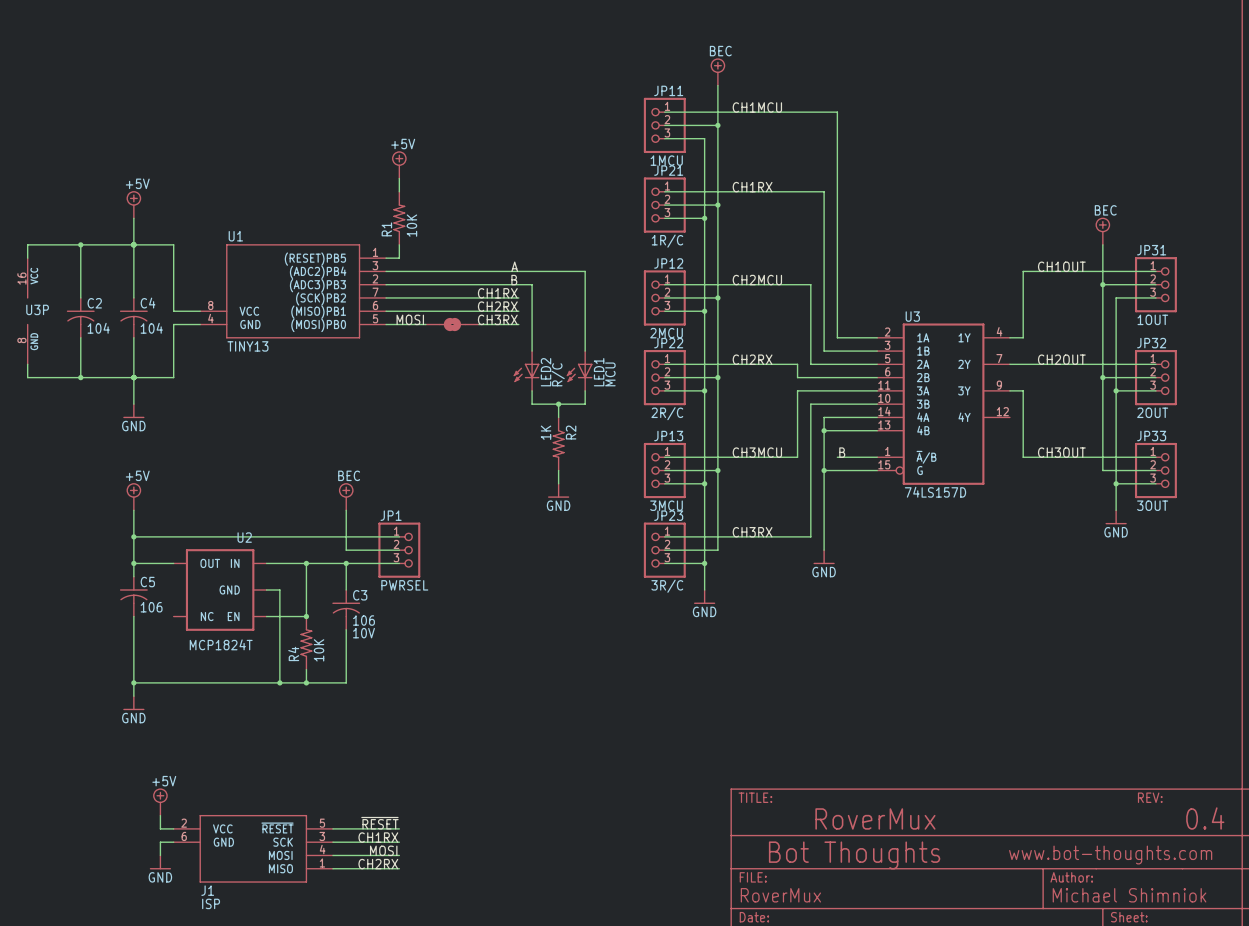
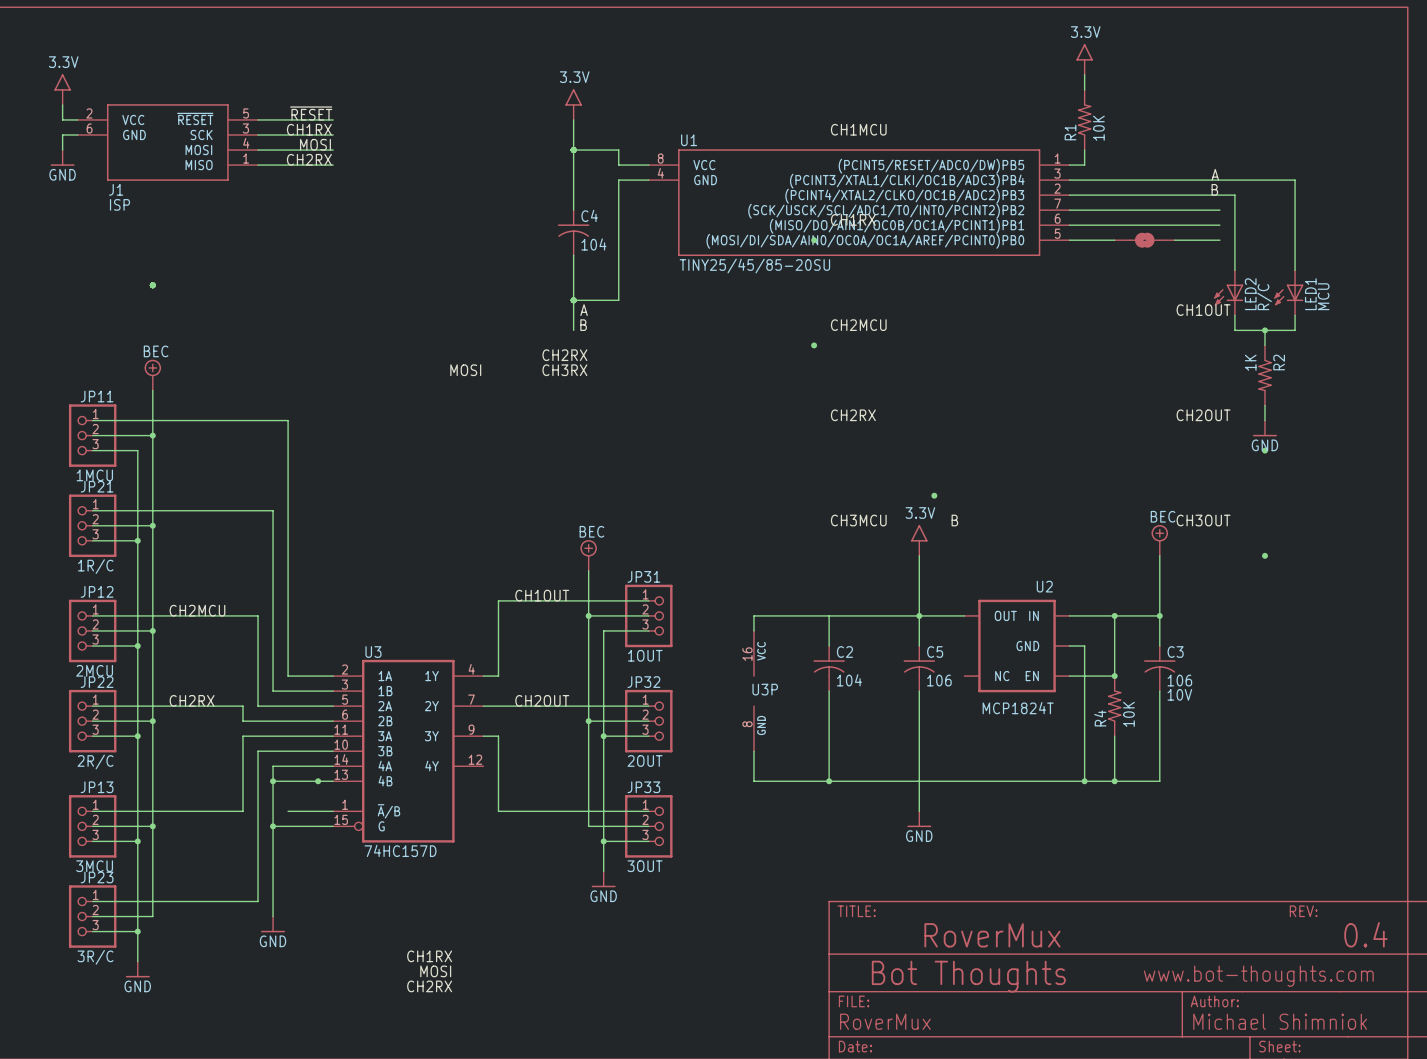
power symbol: none -> (1084, 59)
wire: none -> (1084, 74) (1084, 89)
power symbol: none -> (62, 89)
power symbol: BEC (717, 71) -> none
wire: none -> (62, 104) (62, 119) (77, 119)
power symbol: none -> (573, 104)
wire: (717, 85) (717, 550) (664, 550) -> (753, 615) (753, 630)
label: none -> ~{RESET} (311, 113)
wire: none -> (258, 119) (333, 119)
wire: none -> (573, 119) (573, 210)
label: none -> CH1RX (309, 129)
wire: none -> (77, 135) (62, 135) (62, 150)
wire: none -> (258, 135) (333, 135)
wire: (664, 112) (837, 112) (837, 337) (877, 337) -> none
label: none -> MOSI (315, 144)
wire: none -> (258, 150) (333, 150)
wire: none -> (573, 150) (618, 150) (618, 165) (648, 165)
junction: none -> (573, 150)
JP11 position: (664, 125) -> (92, 435)
junction: (717, 125) -> none
wire: none -> (1084, 150) (1084, 165) (1069, 165)
power symbol: none -> GND (62, 157)
label: none -> CH2RX (309, 159)
wire: none -> (258, 165) (333, 165)
wire: (664, 138) (704, 138) (704, 589) -> none
label: none -> A (1215, 174)
wire: none -> (648, 180) (618, 180) (618, 300) (573, 300)
wire: none -> (1069, 180) (1295, 180) (1295, 270)
label: none -> B (1214, 189)
power symbol: +5V (399, 164) -> none
wire: none -> (1069, 195) (1234, 195) (1234, 270)
wire: (399, 178) (399, 191) -> none
wire: none -> (1069, 210) (1219, 210)
wire: (664, 191) (824, 191) (824, 351) (877, 351) -> none
wire: none -> (1069, 225) (1219, 225)
power symbol: +5V (133, 204) -> none
wire: (664, 205) (717, 205) -> none
JP21 position: (664, 205) -> (92, 525)
wire: none -> (1069, 240) (1114, 240)
part: none -> (1144, 240)
wire: none -> (1174, 240) (1219, 240)
wire: (133, 218) (133, 297) -> none
R1 position: (399, 218) -> (1084, 119)
wire: none -> (573, 255) (573, 330)
junction: (704, 218) -> none
power symbol: BEC (1102, 231) -> none
U1 name position: U1 (235, 236) -> U1 (689, 140)
wire: (80, 244) (80, 297) -> none
junction: (80, 244) -> none
U1 symbol: [200, 244, 387, 339] -> [648, 149, 1070, 256]
wire: (399, 244) (399, 258) (386, 258) -> none
wire: (1102, 244) (1102, 470) (1155, 470) -> none
wire: (27, 258) (27, 244) (173, 244) (173, 311) (200, 311) -> none
junction: none -> (573, 300)
wire: (386, 271) (585, 271) (585, 351) -> none
wire: none -> (1234, 315) (1234, 330) (1249, 330)
wire: (1155, 271) (1023, 271) (1023, 337) (1009, 337) -> none
wire: (386, 284) (532, 284) (532, 351) -> none
wire: (664, 284) (810, 284) (810, 364) (877, 364) -> none
junction position: (1102, 284) -> (1264, 330)
wire: none -> (1264, 330) (1264, 345)
wire: (1142, 284) (1155, 284) -> (1295, 330) (1295, 315)
JP31 position: (1155, 284) -> (648, 615)
label: CH1RX (497, 293) -> none
wire: (386, 297) (518, 297) -> none
wire: (664, 297) (717, 297) -> none
JP12 position: (664, 297) -> (92, 630)
wire: (1155, 297) (1116, 297) (1116, 351) -> none
U3P position: (27, 311) -> (753, 691)
wire: (386, 311) (518, 311) -> none
wire: (664, 311) (704, 311) -> none
junction: (704, 311) -> none
C2 position: (80, 317) -> (829, 668)
C4 position: (133, 317) -> (573, 232)
power symbol: none -> BEC (152, 375)
wire: (200, 324) (173, 324) (173, 377) (133, 377) -> none
wire: (386, 324) (425, 324) -> none
part: (452, 324) -> none
wire: (478, 324) (518, 324) -> none
wire: (80, 337) (80, 377) (27, 377) (27, 364) -> none
U1 value: TINY13 (247, 346) -> TINY25/45/85-20SU (754, 266)
wire: none -> (92, 420) (288, 420) (288, 676) (303, 676)
wire: (664, 364) (797, 364) (797, 377) (877, 377) -> none
wire: (1009, 364) (1155, 364) -> none
wire: (1116, 364) (1116, 510) -> none
LED2 position: (526, 370) -> (1228, 292)
LED1 position: (579, 370) -> (1288, 292)
power symbol: none -> GND (1264, 428)
junction: (80, 377) -> none
wire: (664, 377) (717, 377) -> none
JP22 position: (664, 377) -> (92, 721)
junction: (717, 377) -> none
wire: (1102, 377) (1155, 377) -> none
junction: (1102, 377) -> none
JP32 position: (1155, 377) -> (648, 721)
wire: none -> (92, 450) (137, 450) (137, 961)
wire: (532, 390) (532, 404) (585, 404) (585, 390) -> none
wire: (664, 390) (704, 390) -> none
junction: (704, 390) -> none
wire: (877, 390) (797, 390) (797, 457) (664, 457) -> none
wire: (1009, 390) (1023, 390) (1023, 457) (1155, 457) -> none
wire: (1116, 390) (1155, 390) -> none
wire: none -> (152, 465) (152, 585)
wire: (558, 404) (558, 417) -> none
junction: (558, 404) -> none
wire: (877, 404) (810, 404) (810, 483) -> none
U3 position: (943, 404) -> (408, 751)
power symbol: GND (133, 411) -> none
wire: (877, 417) (824, 417) (824, 550) -> none
wire: (824, 430) (877, 430) -> none
wire: none -> (92, 510) (273, 510) (273, 691) (333, 691)
R2 position: (558, 443) -> (1264, 375)
wire: none -> (92, 525) (152, 525)
junction: none -> (152, 525)
wire: (837, 457) (877, 457) -> none
wire: none -> (92, 540) (137, 540)
junction: none -> (137, 540)
wire: (558, 470) (558, 483) -> none
wire: (664, 470) (717, 470) -> none
JP13 position: (664, 470) -> (92, 826)
junction: (717, 470) -> none
power symbol: none -> (919, 540)
wire: (824, 470) (877, 470) -> none
junction: (824, 470) -> none
power symbol: none -> BEC (1159, 540)
JP33 position: (1155, 470) -> (648, 826)
power symbol: none -> BEC (588, 555)
wire: (664, 483) (704, 483) -> none
junction: (704, 483) -> none
wire: none -> (1159, 555) (1159, 646)
wire: (1116, 483) (1155, 483) -> none
power symbol: GND (558, 490) -> none
U3 value: 74LS157D (935, 492) -> 74HC157D (400, 850)
power symbol: +5V (133, 496) -> none
power symbol: BEC (346, 496) -> none
wire: none -> (588, 570) (588, 826) (648, 826)
wire: (346, 510) (346, 550) (399, 550) -> none
power symbol: GND (1116, 517) -> none
label: none -> CH1OUT (542, 595)
wire: none -> (648, 600) (498, 600) (498, 676) (483, 676)
label: none -> CH2MCU (197, 610)
label: CH3RX (752, 532) -> none
wire: none -> (92, 615) (152, 615)
junction: (133, 536) -> none
wire: (226, 536) (399, 536) -> (258, 615) (258, 706) (303, 706)
wire: none -> (588, 615) (648, 615)
junction: none -> (588, 615)
wire: none -> (829, 615) (829, 646)
junction: none -> (919, 615)
wire: none -> (964, 615) (919, 615) (919, 646)
wire: none -> (1069, 615) (1159, 615)
wire: none -> (1114, 615) (1114, 676) (1069, 676)
junction: none -> (1114, 615)
junction: none -> (1159, 615)
wire: none -> (92, 630) (152, 630)
junction: none -> (152, 630)
JP1: PWRSEL (399, 550) -> none
wire: none -> (648, 630) (603, 630) (603, 871)
JP23 position: (664, 550) -> (92, 916)
power symbol: GND (824, 557) -> none
junction: none -> (137, 646)
wire: (133, 563) (173, 563) -> (92, 646) (137, 646)
junction: (133, 563) -> none
wire: (266, 563) (399, 563) -> none
wire: (306, 563) (306, 616) (293, 616) -> none
junction: (306, 563) -> none
wire: (346, 563) (346, 589) -> none
junction: (346, 563) -> none
wire: (664, 563) (704, 563) -> none
junction: (704, 563) -> none
wire: none -> (1069, 646) (1084, 646) (1084, 781)
U2 position: (220, 589) -> (1017, 646)
wire: (279, 589) (279, 682) -> (318, 676) (333, 676)
junction: none -> (1114, 676)
C5 position: (133, 596) -> (919, 668)
power symbol: GND (704, 596) -> none
wire: none -> (829, 691) (829, 781)
wire: none -> (919, 691) (919, 811)
wire: none -> (1159, 691) (1159, 781) (753, 781) (753, 751)
C3 position: (346, 609) -> (1159, 668)
label: none -> CH2RX (192, 700)
label: none -> CH2OUT (542, 700)
wire: none -> (92, 706) (242, 706) (242, 721) (333, 721)
junction: (306, 616) -> none
wire: none -> (483, 706) (648, 706)
wire: none -> (92, 721) (152, 721)
junction: none -> (152, 721)
wire: (346, 629) (346, 682) (293, 682) -> none
wire: none -> (588, 721) (648, 721)
junction: none -> (588, 721)
wire: none -> (92, 736) (137, 736)
junction: none -> (137, 736)
wire: none -> (333, 736) (242, 736) (242, 811) (92, 811)
R4 position: (306, 643) -> (1114, 706)
wire: none -> (483, 736) (498, 736) (498, 811) (648, 811)
wire: none -> (603, 736) (648, 736)
junction: none -> (603, 736)
wire: none -> (1114, 736) (1114, 781)
wire: none -> (333, 751) (258, 751) (258, 901) (92, 901)
wire: none -> (333, 766) (273, 766) (273, 916)
wire: (306, 669) (306, 682) -> none
wire: (133, 682) (240, 682) -> none
junction: (133, 682) -> none
junction: none -> (273, 781)
junction: (306, 682) -> none
junction: none -> (829, 781)
junction: none -> (1084, 781)
junction: none -> (1114, 781)
wire: none -> (152, 796) (152, 916) (92, 916)
power symbol: GND (133, 703) -> none
wire: none -> (288, 811) (333, 811)
power symbol: none -> GND (919, 819)
wire: none -> (92, 826) (152, 826)
junction: none -> (152, 826)
wire: none -> (273, 826) (333, 826)
junction: none -> (273, 826)
wire: none -> (92, 841) (137, 841)
junction: none -> (137, 841)
wire: none -> (603, 841) (648, 841)
junction: none -> (603, 841)
power symbol: none -> GND (603, 879)
power symbol: +5V (160, 802) -> none
power symbol: none -> GND (273, 924)
wire: none -> (92, 931) (137, 931)
junction: none -> (137, 931)
wire: (160, 815) (160, 828) (173, 828) -> none
label: ~{RESET} (379, 823) -> none
wire: (332, 828) (399, 828) -> none
wire: (173, 842) (160, 842) (160, 855) -> none
wire: (332, 842) (399, 842) -> none
J1 position: (253, 848) -> (167, 142)
wire: (332, 855) (399, 855) -> none
power symbol position: GND (160, 862) -> GND (137, 969)
wire: (332, 868) (399, 868) -> none

